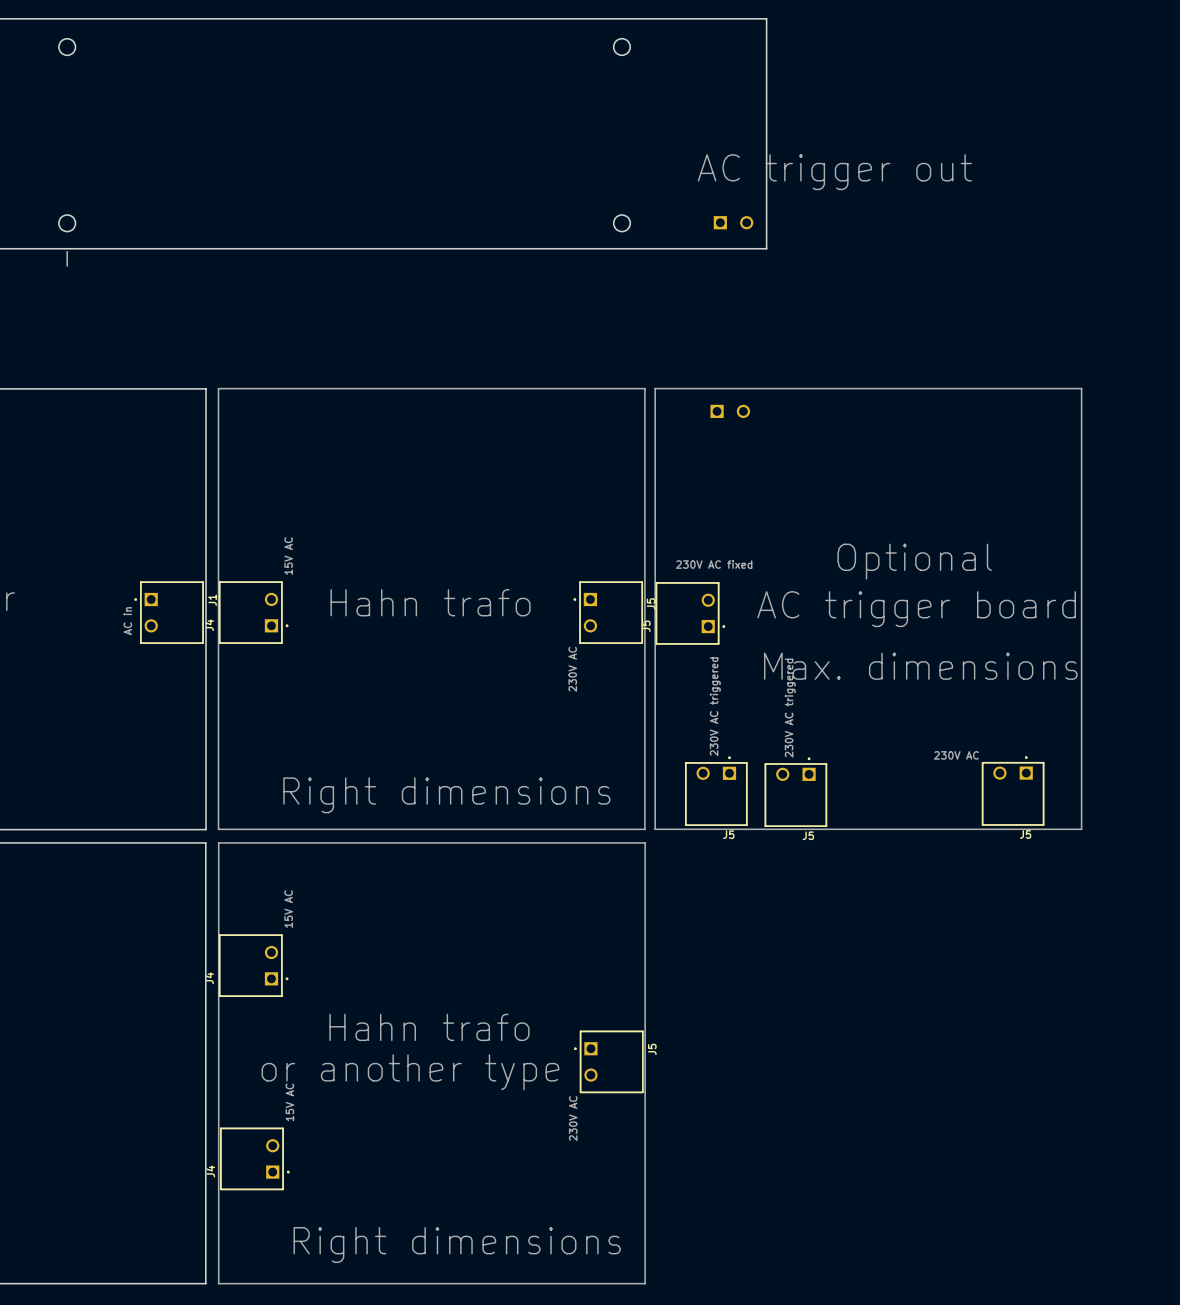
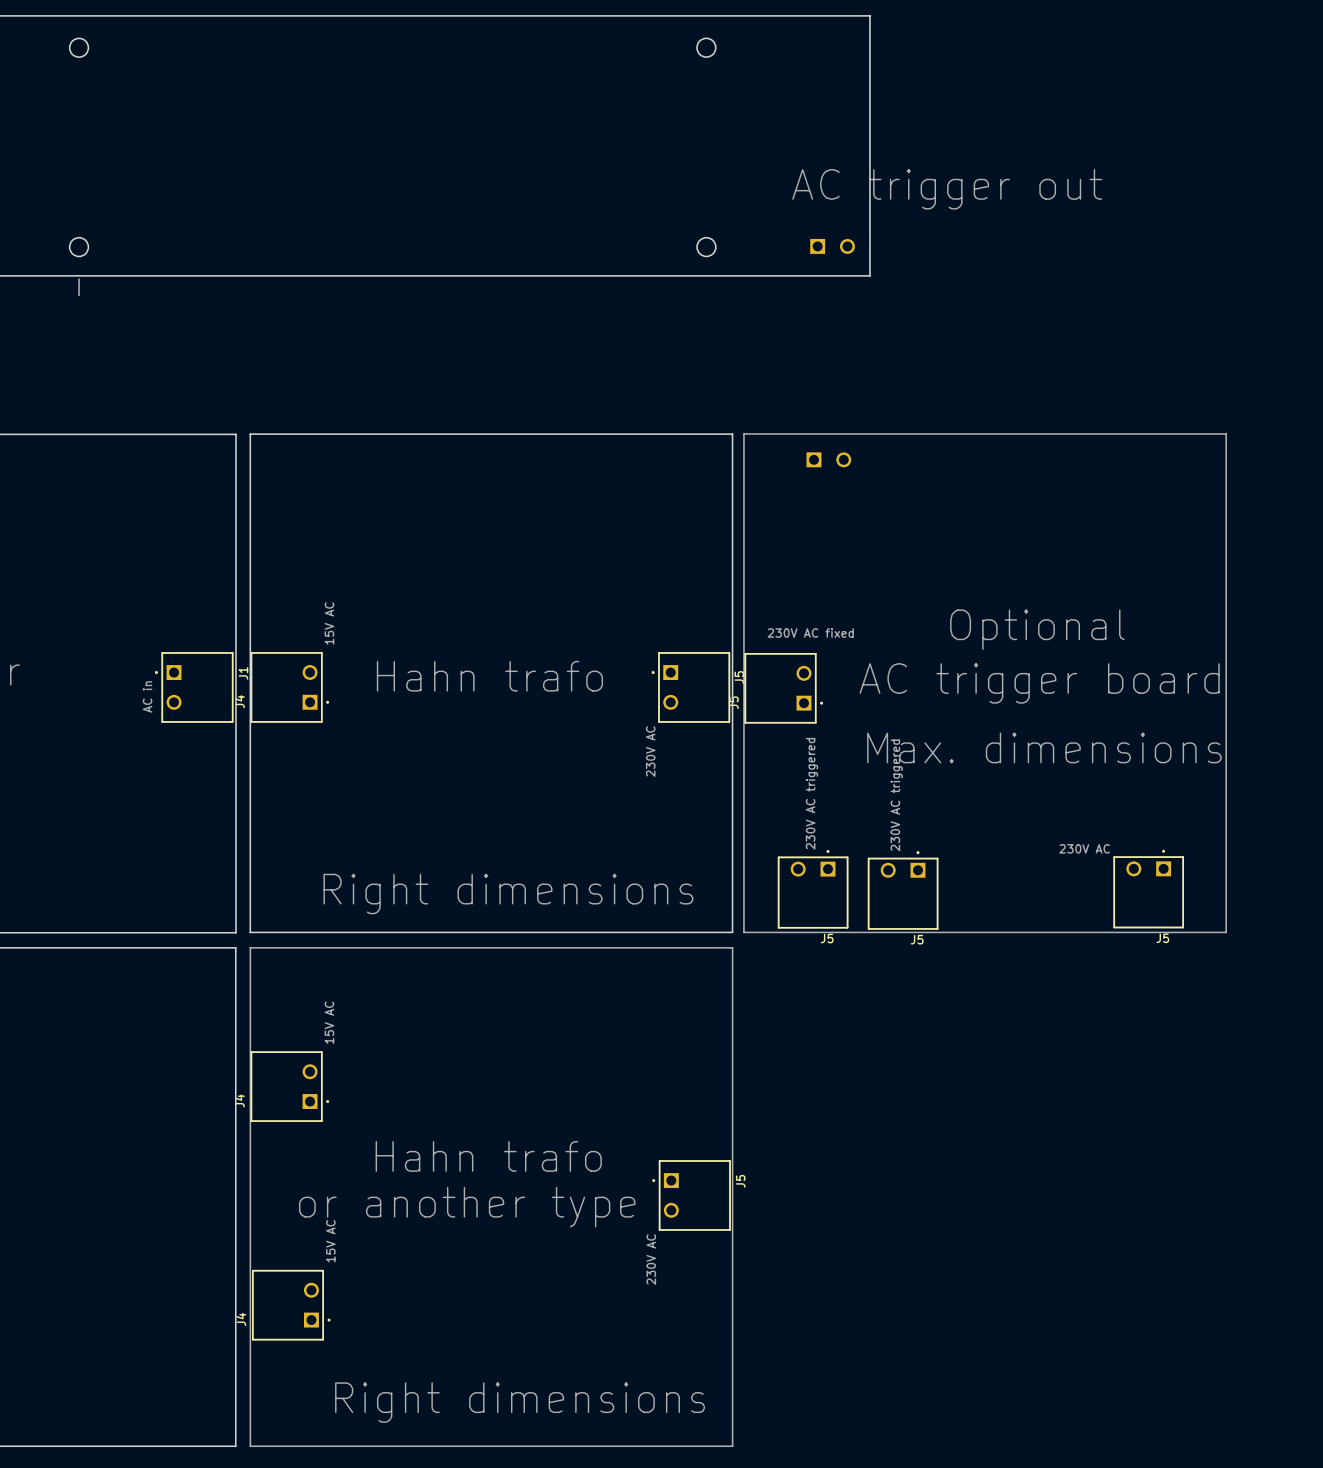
board edge: none -> (250, 434) (732, 434) (732, 932) (250, 932) (250, 434)
line: (218, 388) (644, 388) (644, 829) (218, 829) (218, 388) -> none

